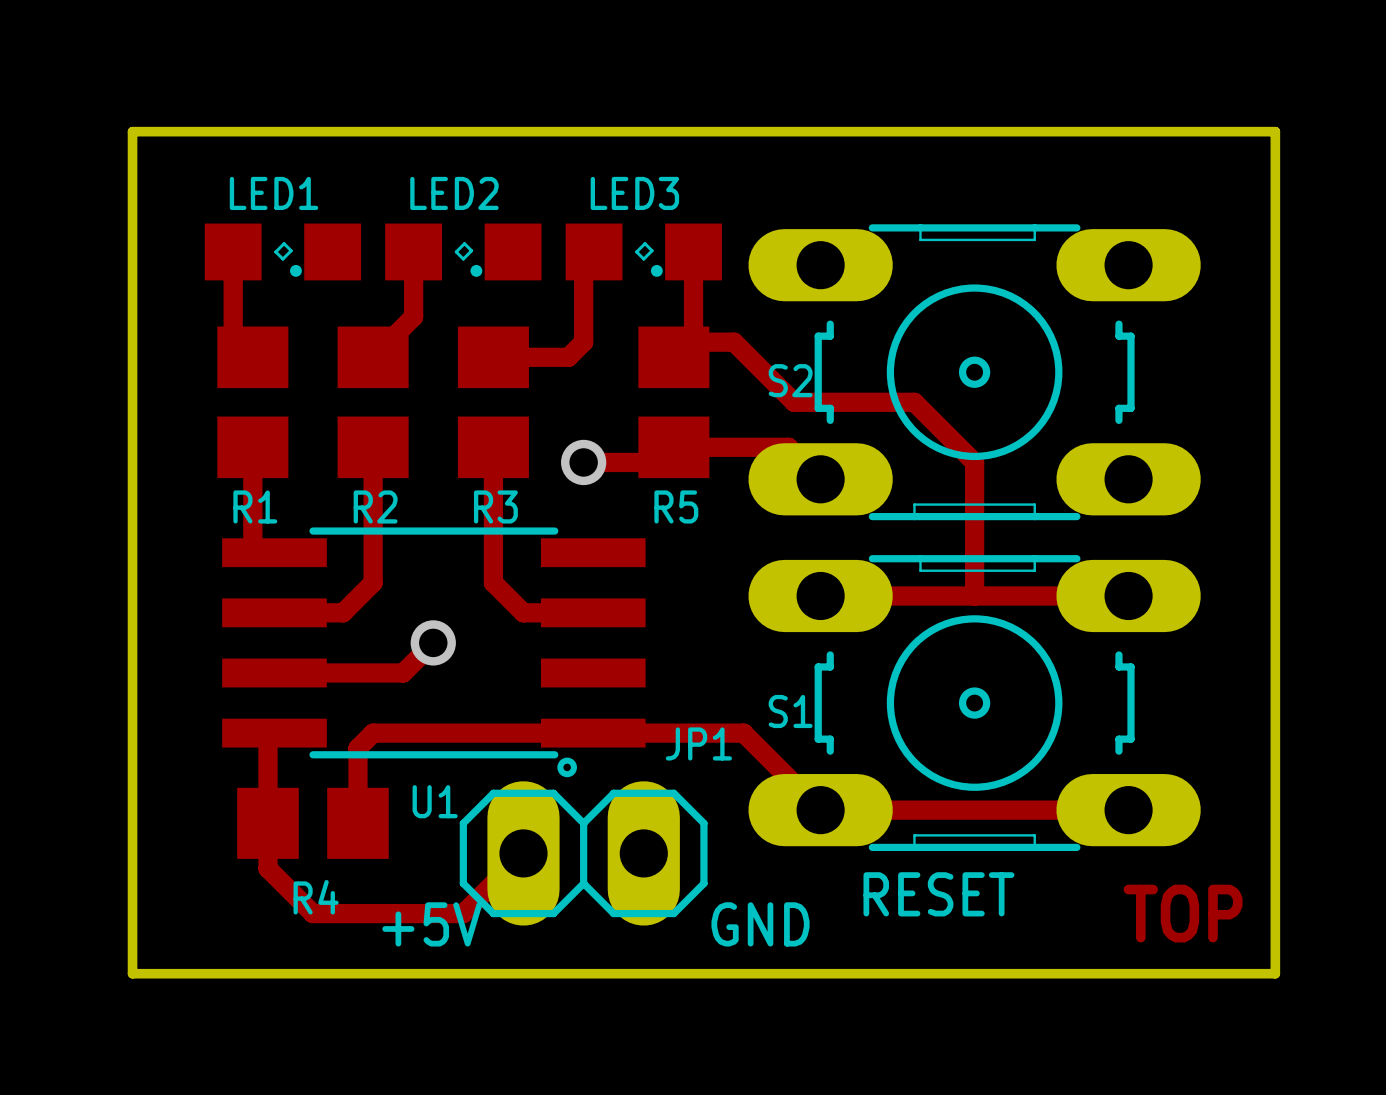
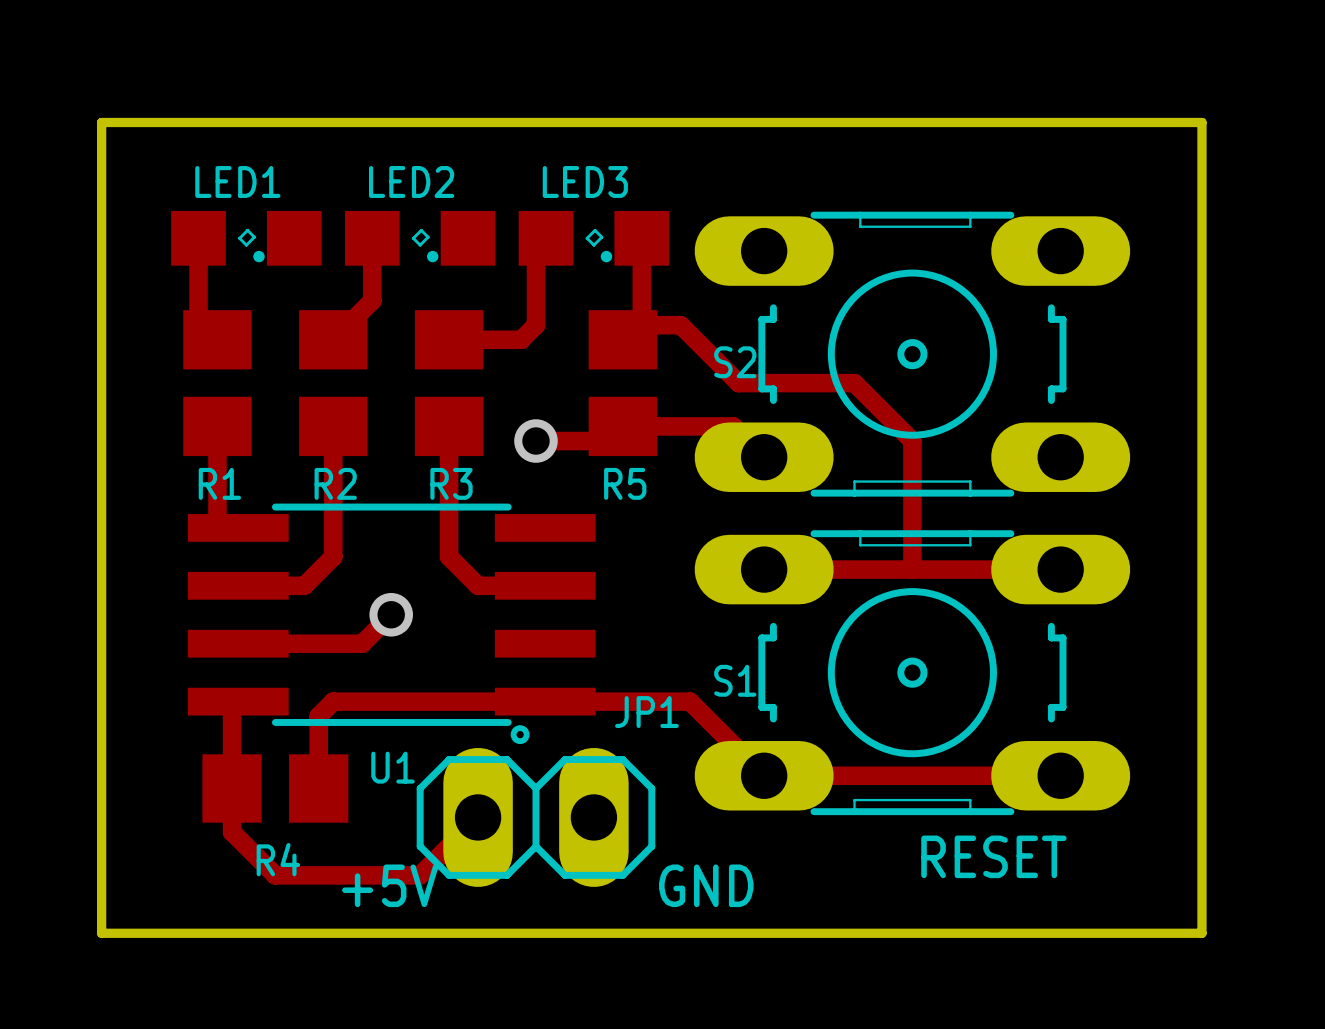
text position: RESET (938, 894) -> RESET (993, 856)
text: TOP (1183, 913) -> none

